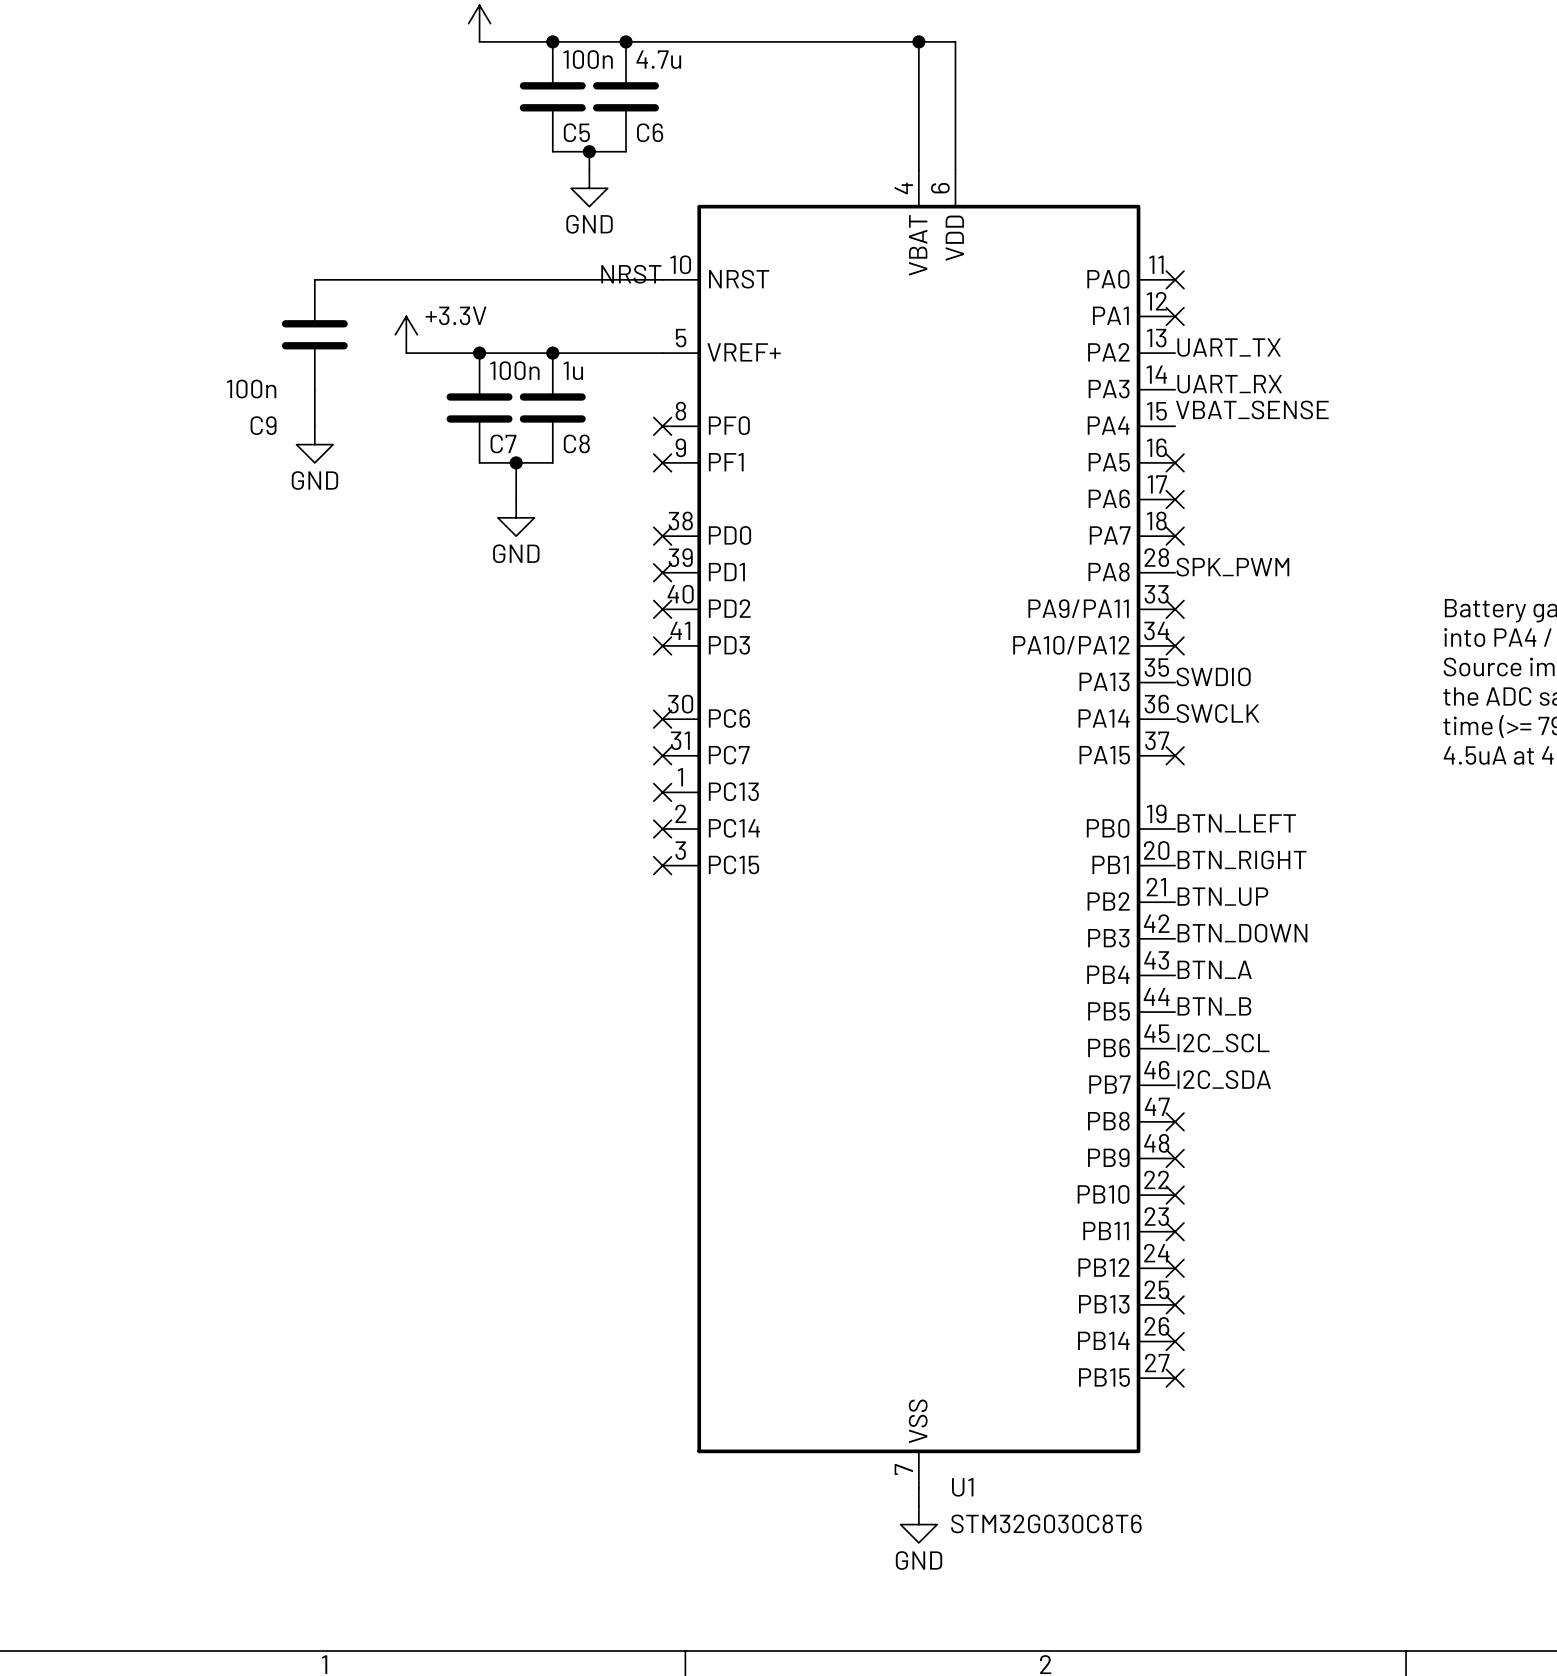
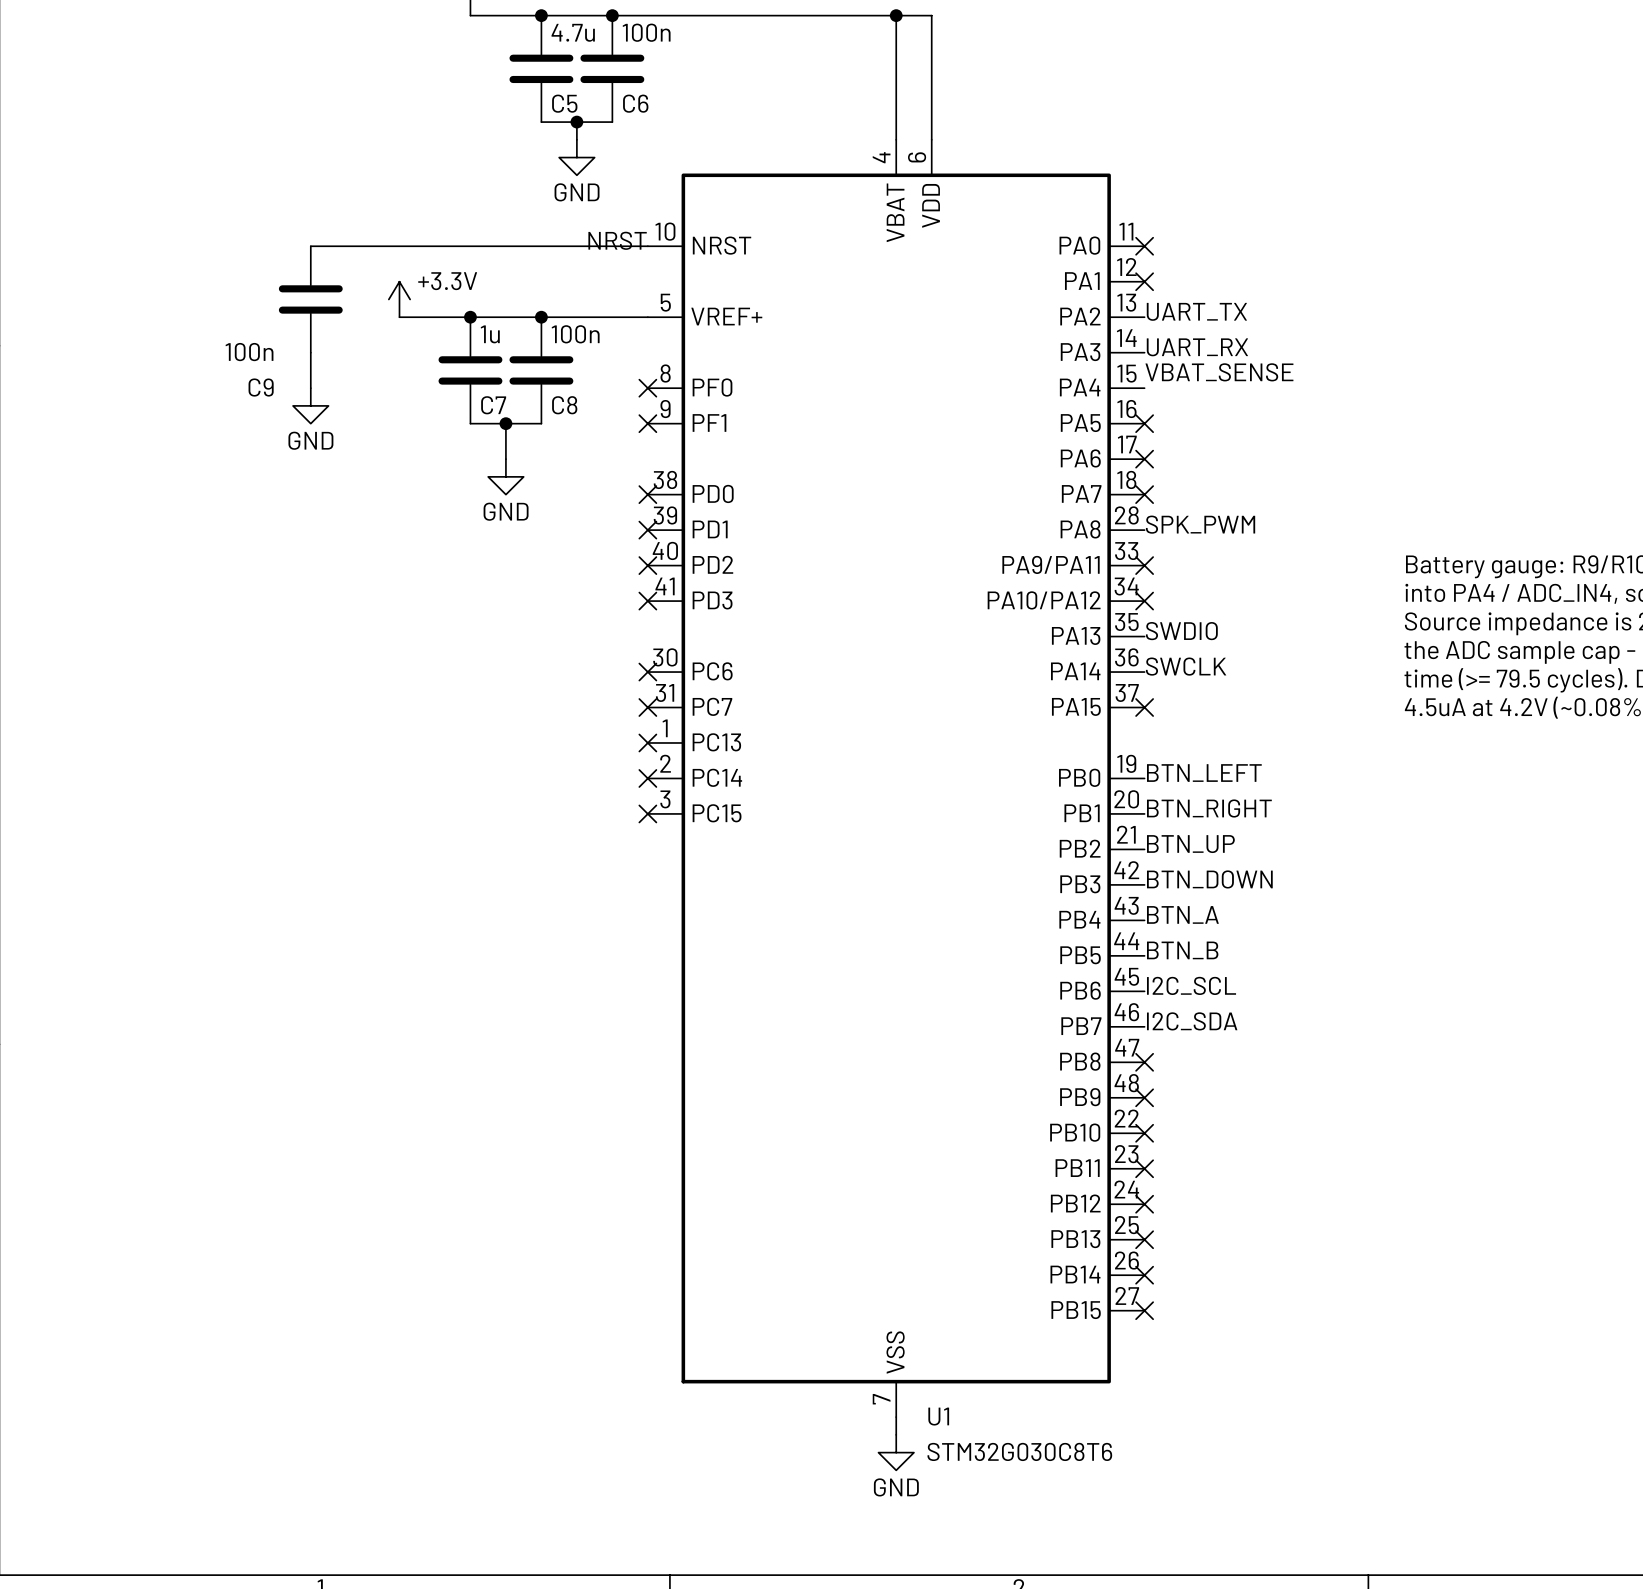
C5 value: 100n (588, 59) -> 4.7u (573, 32)
C6 value: 4.7u (658, 59) -> 100n (646, 32)
C7 value: 100n (514, 370) -> 1u (490, 334)
C8 value: 1u (573, 370) -> 100n (575, 334)

